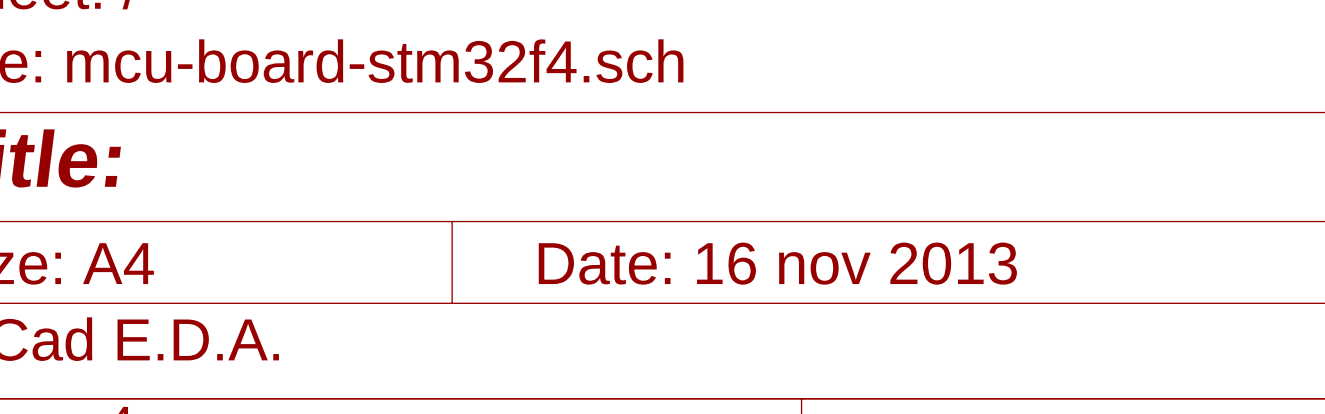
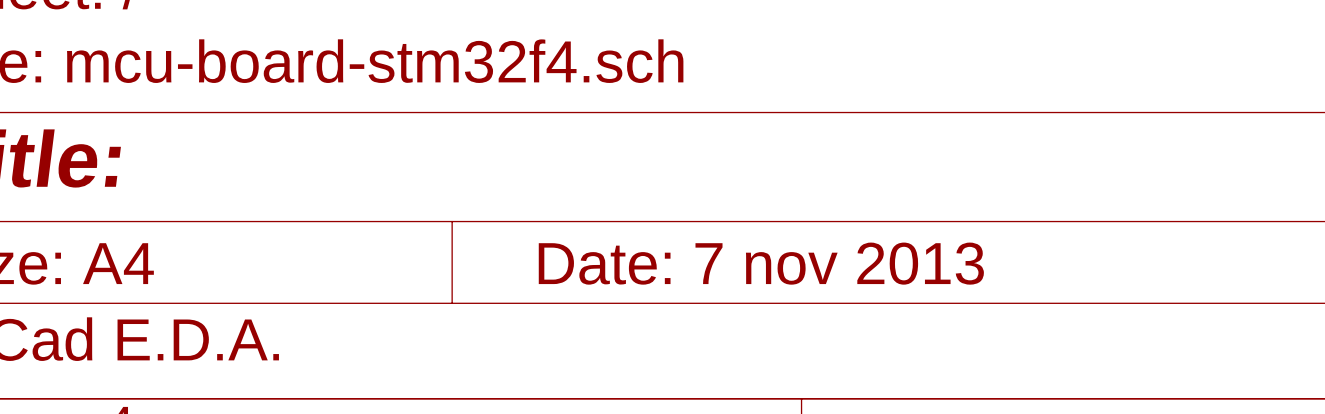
title block: Date: 16 nov 2013 (777, 263) -> Date: 7 nov 2013 (761, 263)

